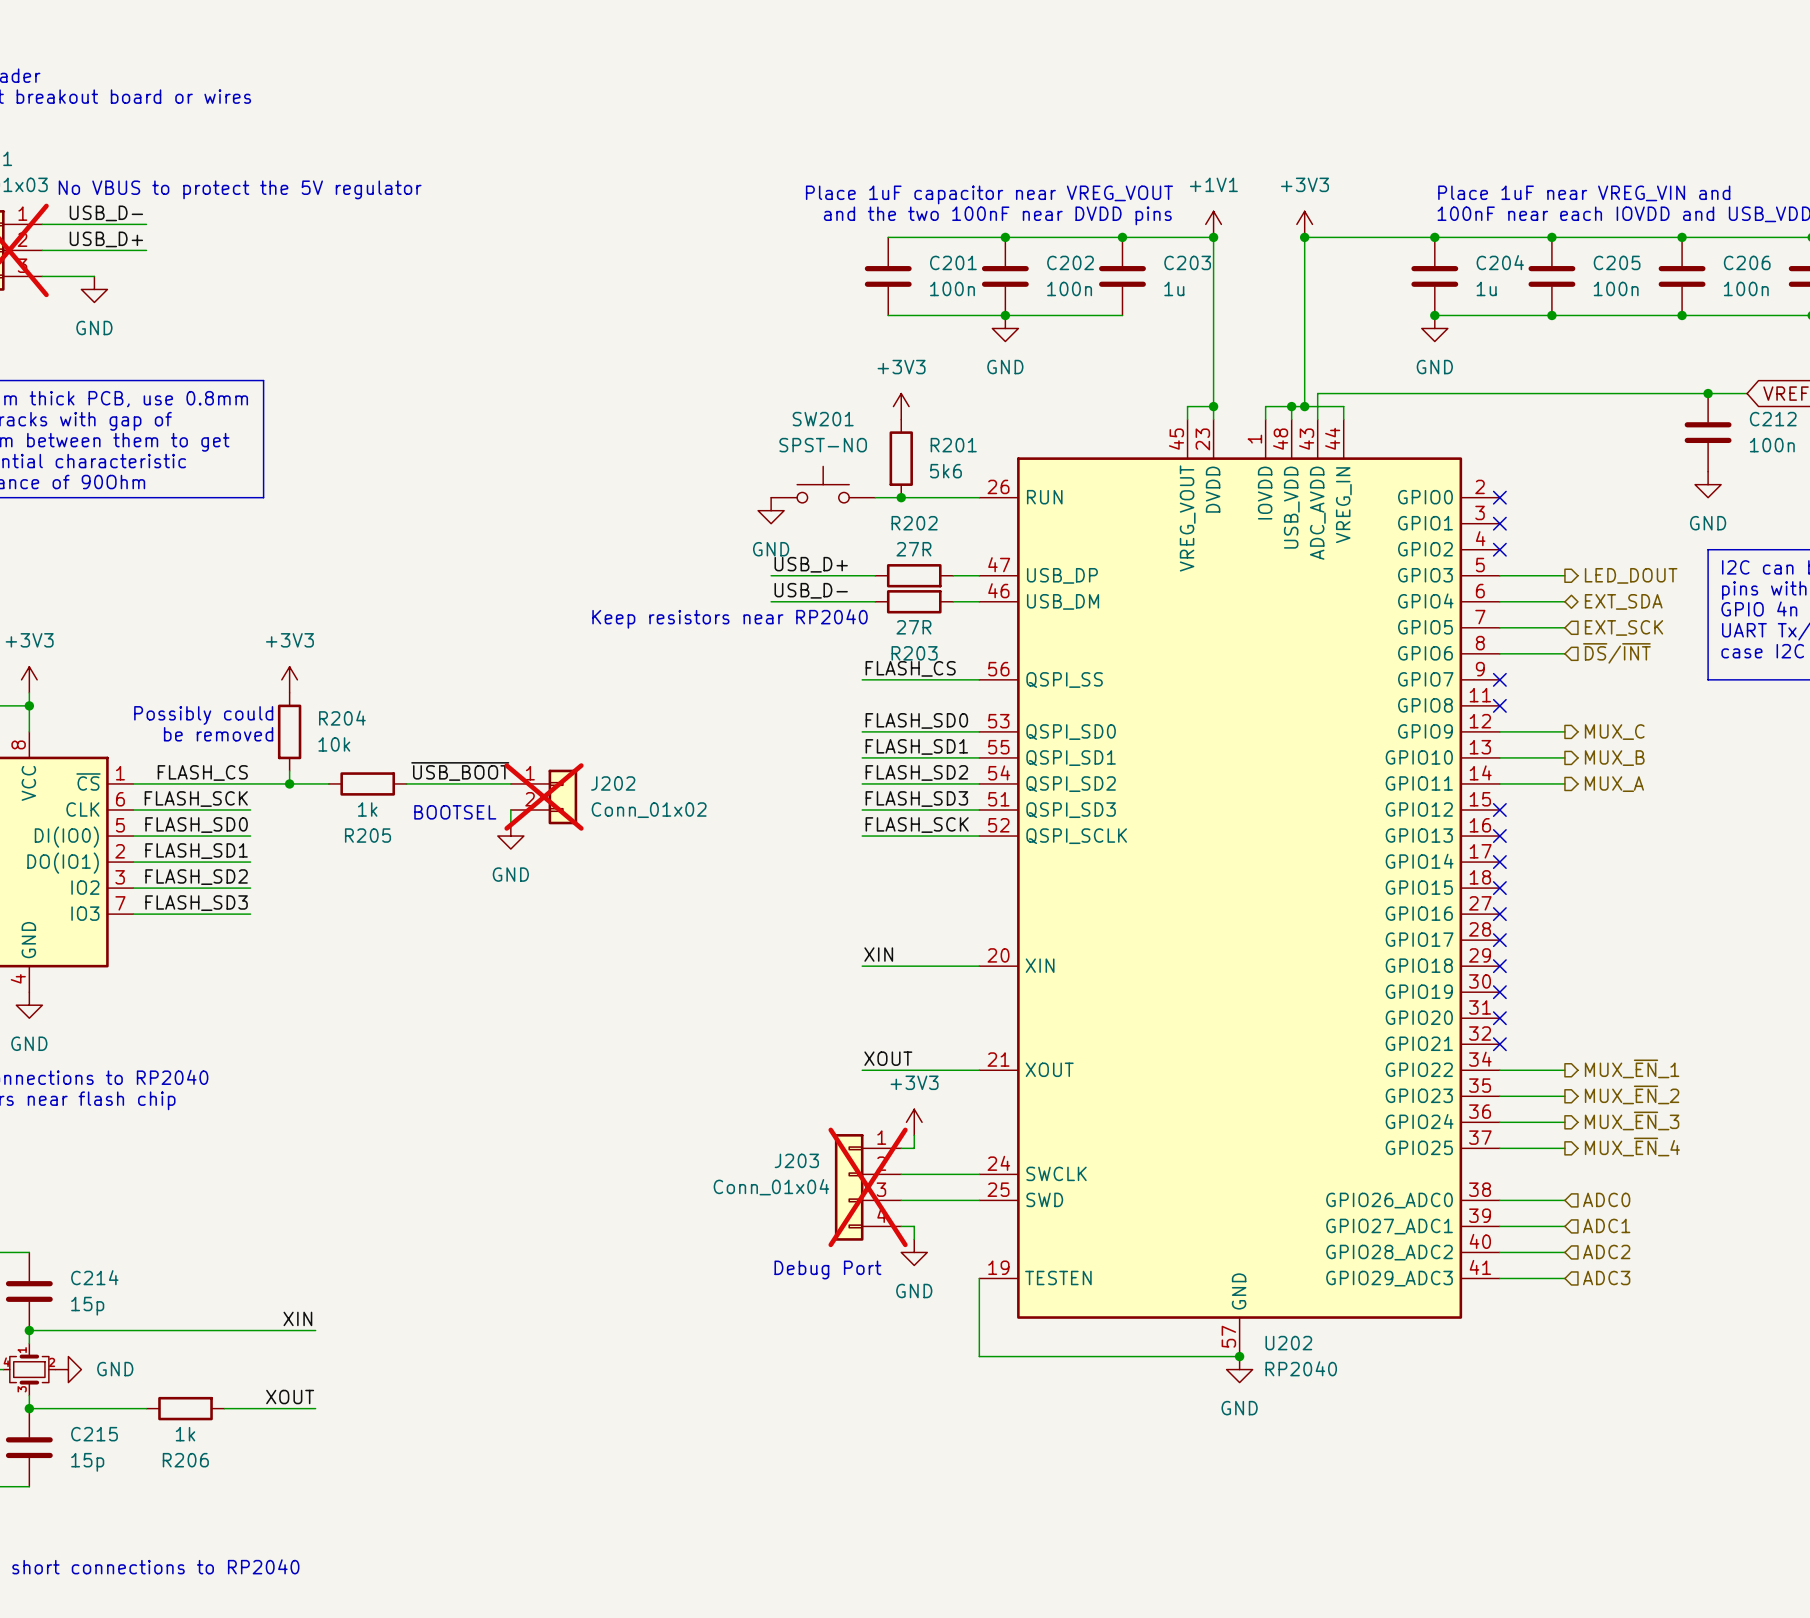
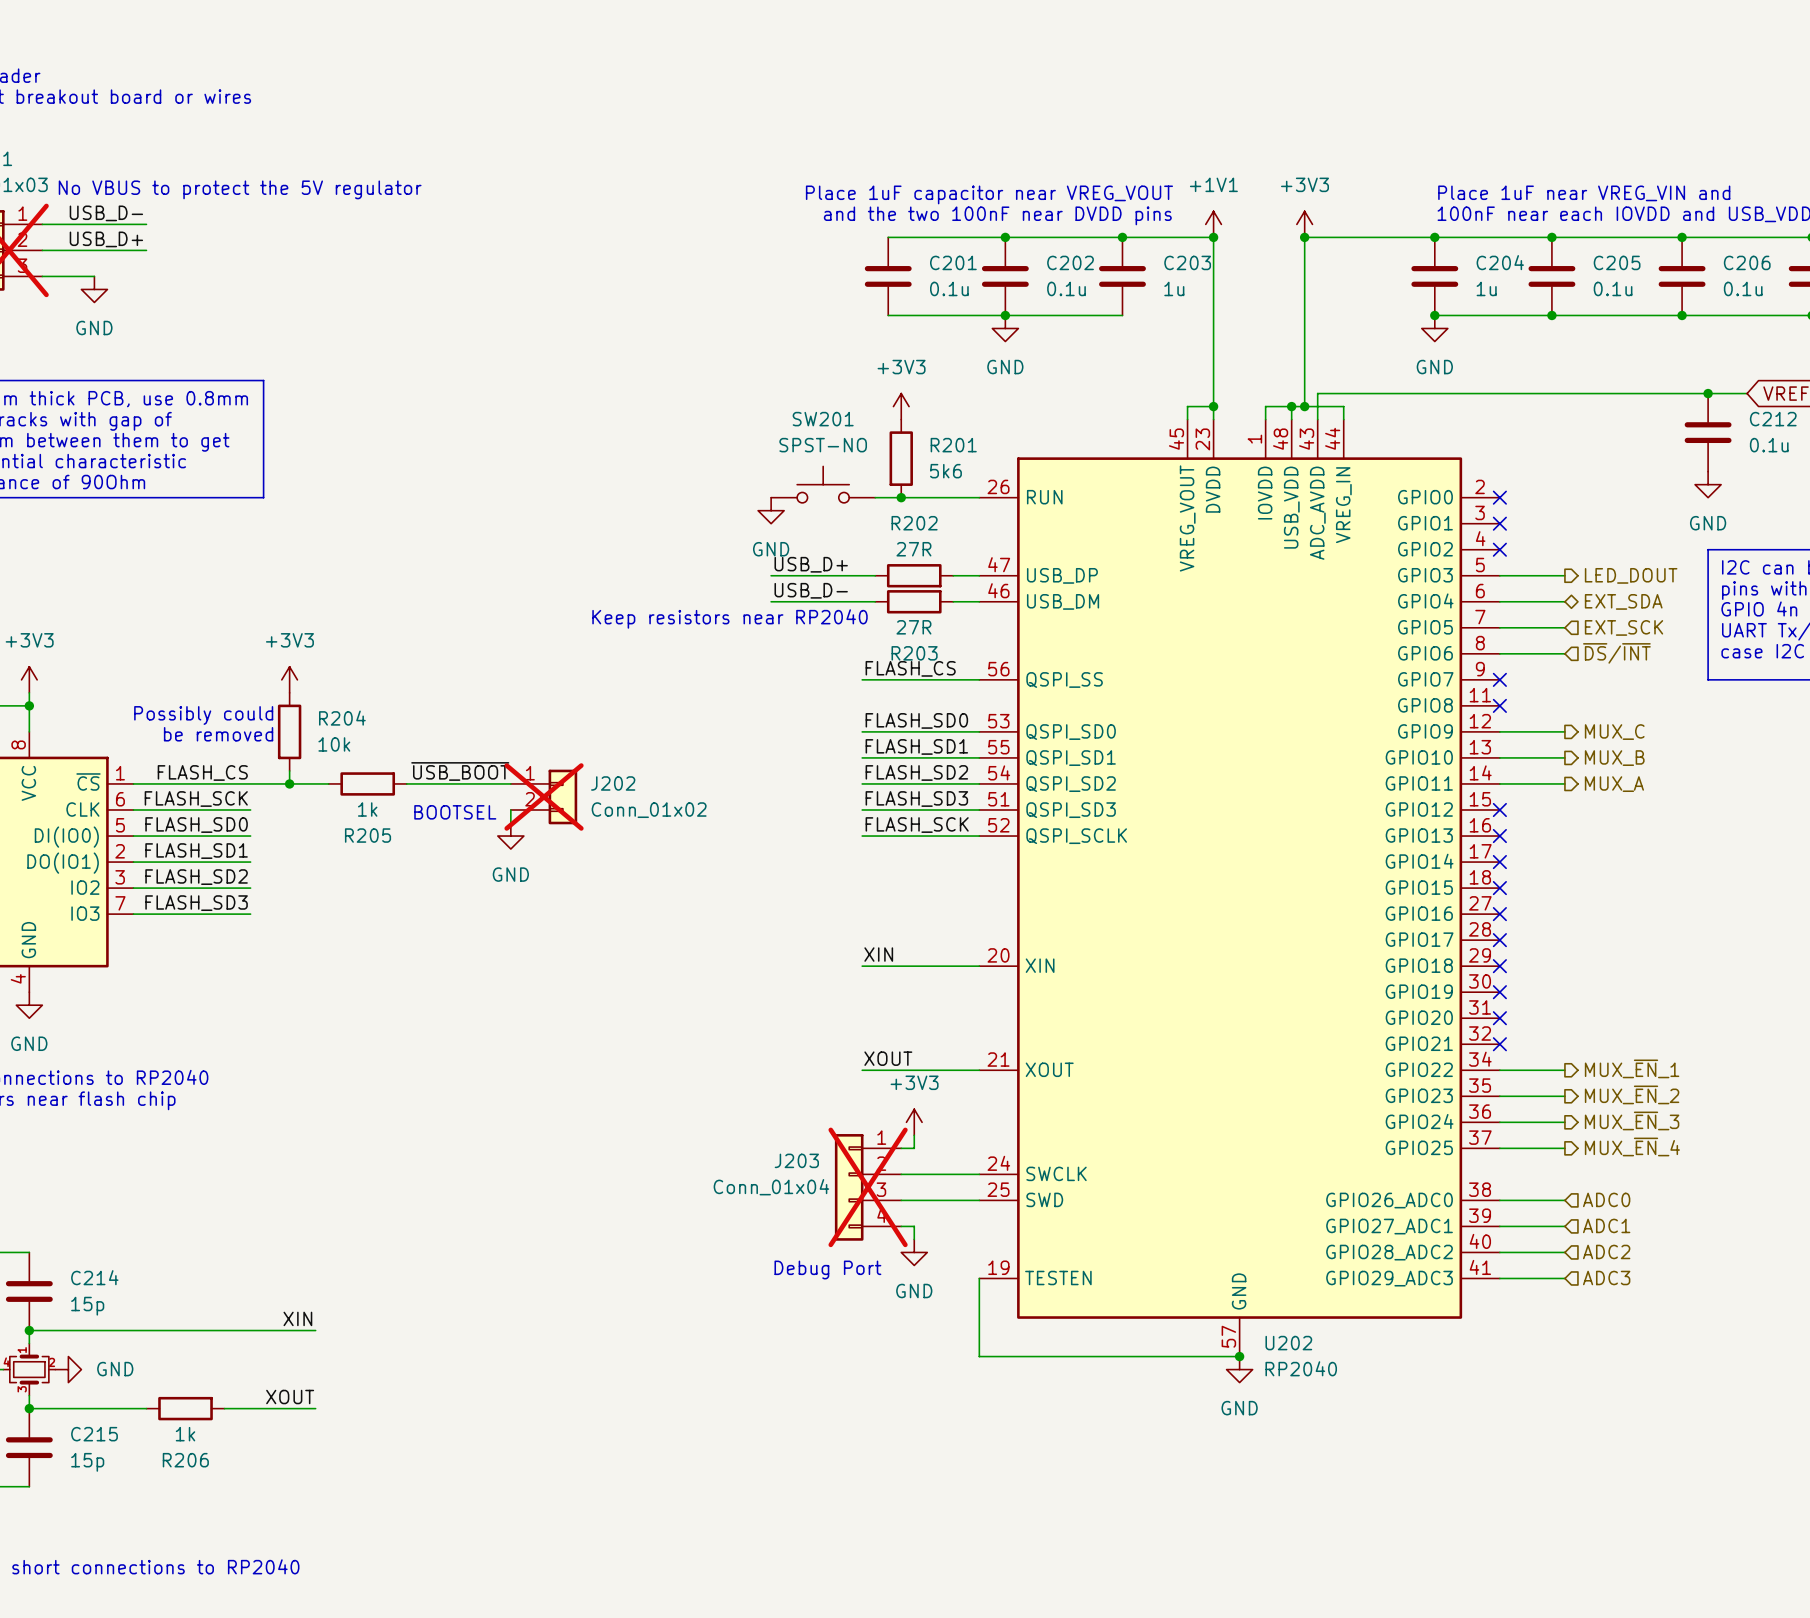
C201 value: 100n (952, 288) -> 0.1u (949, 288)
C202 value: 100n (1069, 288) -> 0.1u (1066, 288)
C205 value: 100n (1616, 288) -> 0.1u (1613, 288)
C206 value: 100n (1746, 288) -> 0.1u (1743, 288)
C212 value: 100n (1772, 445) -> 0.1u (1769, 445)

